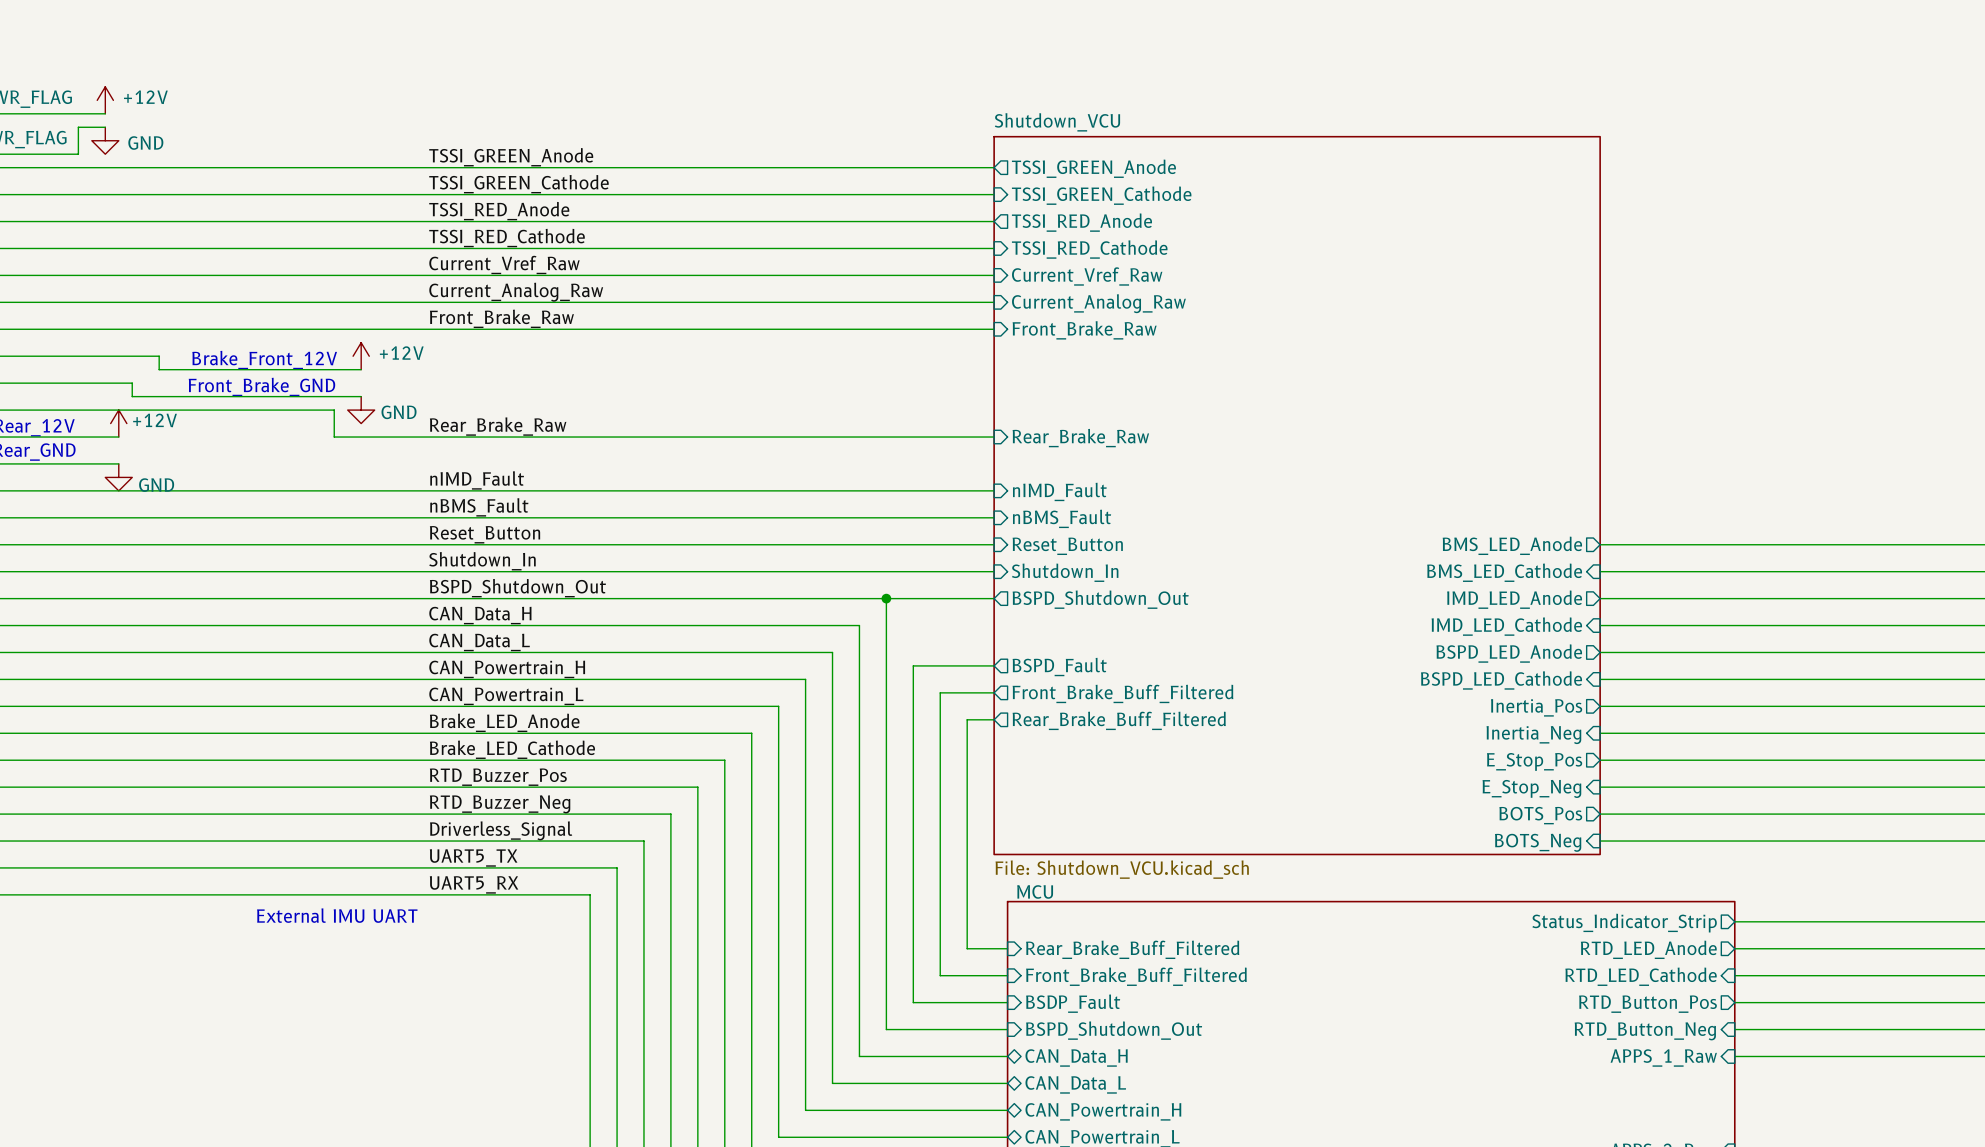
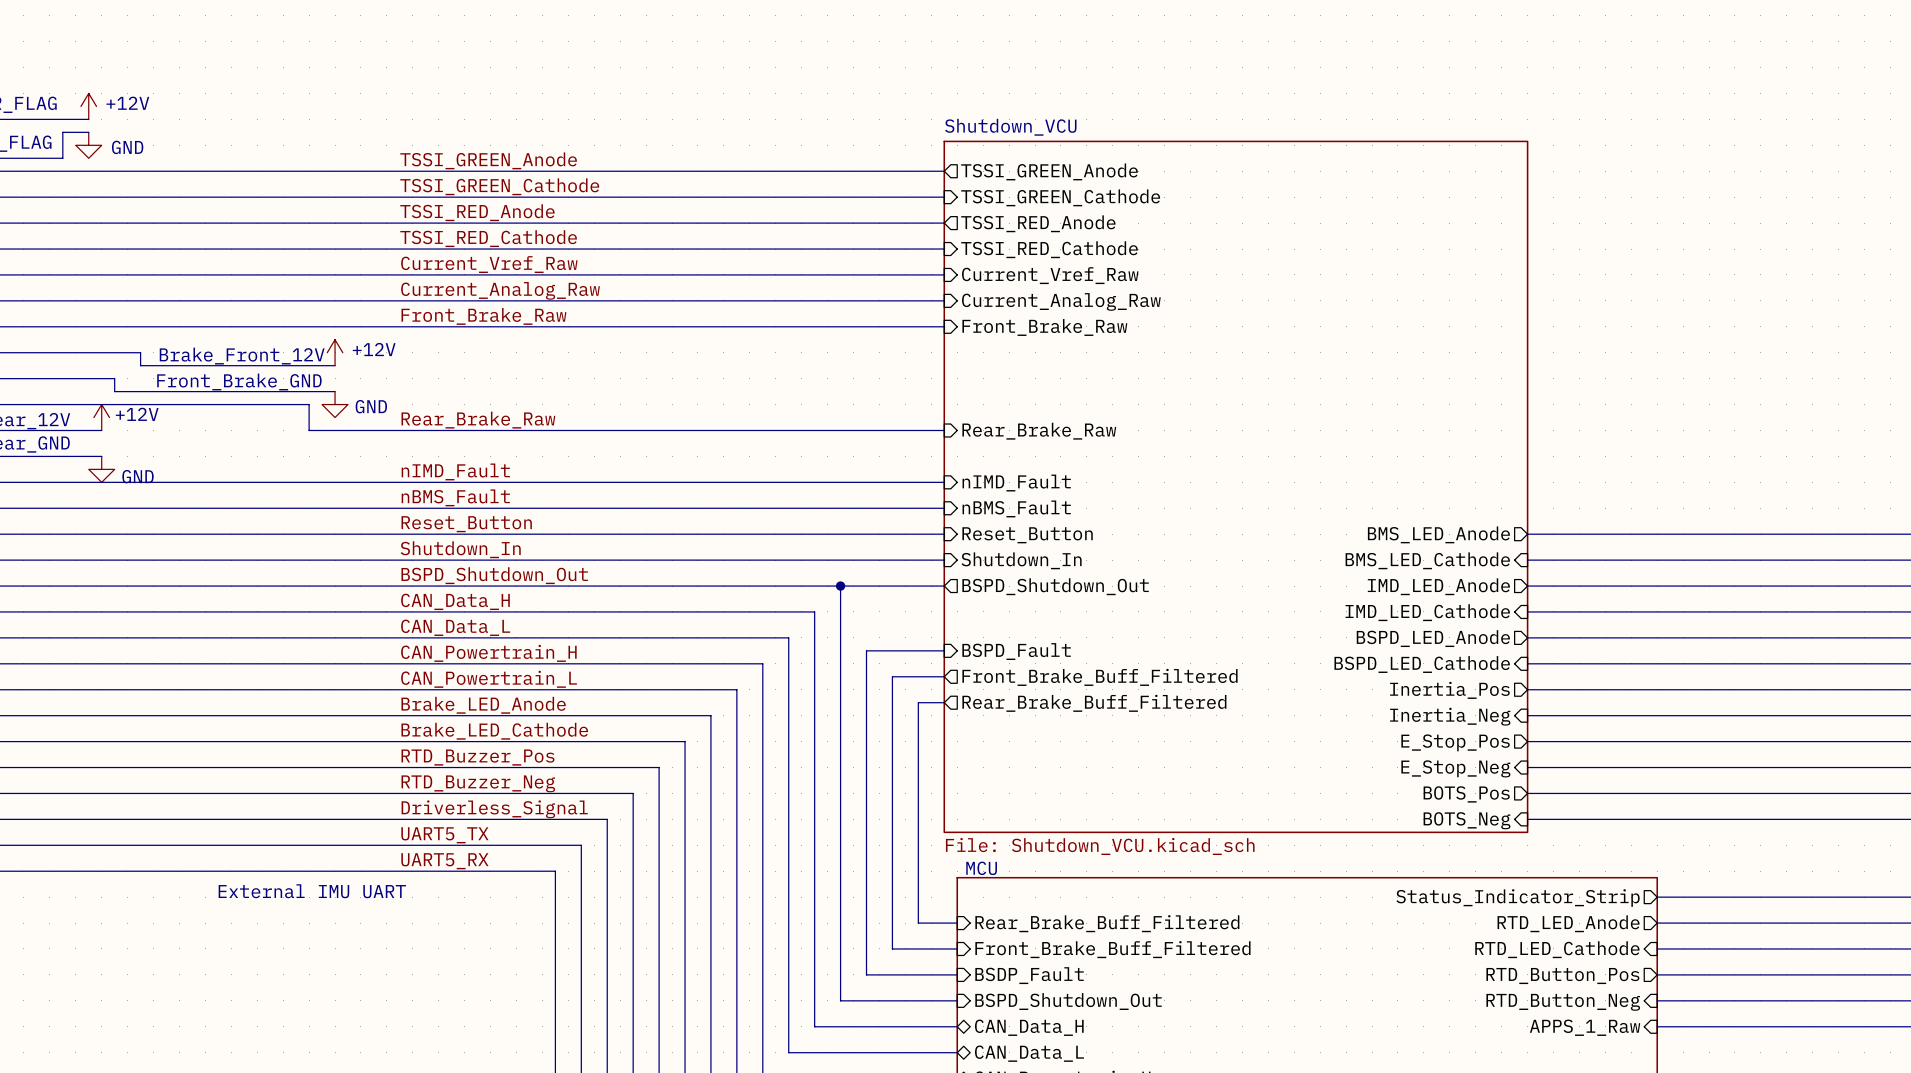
sheet pin shape: output (1059, 667) -> input (1016, 651)

